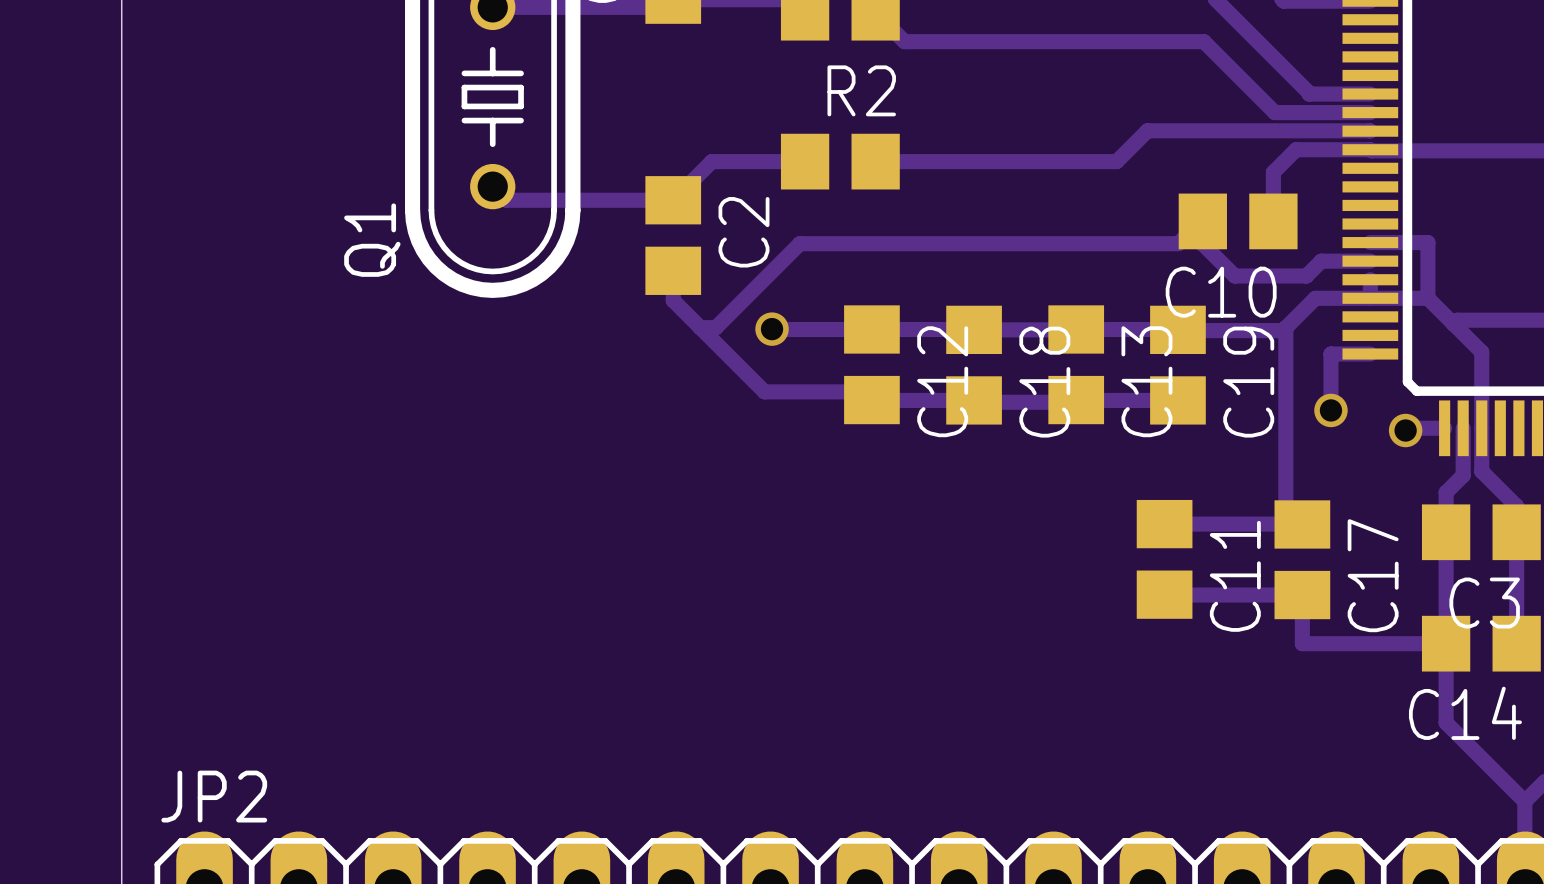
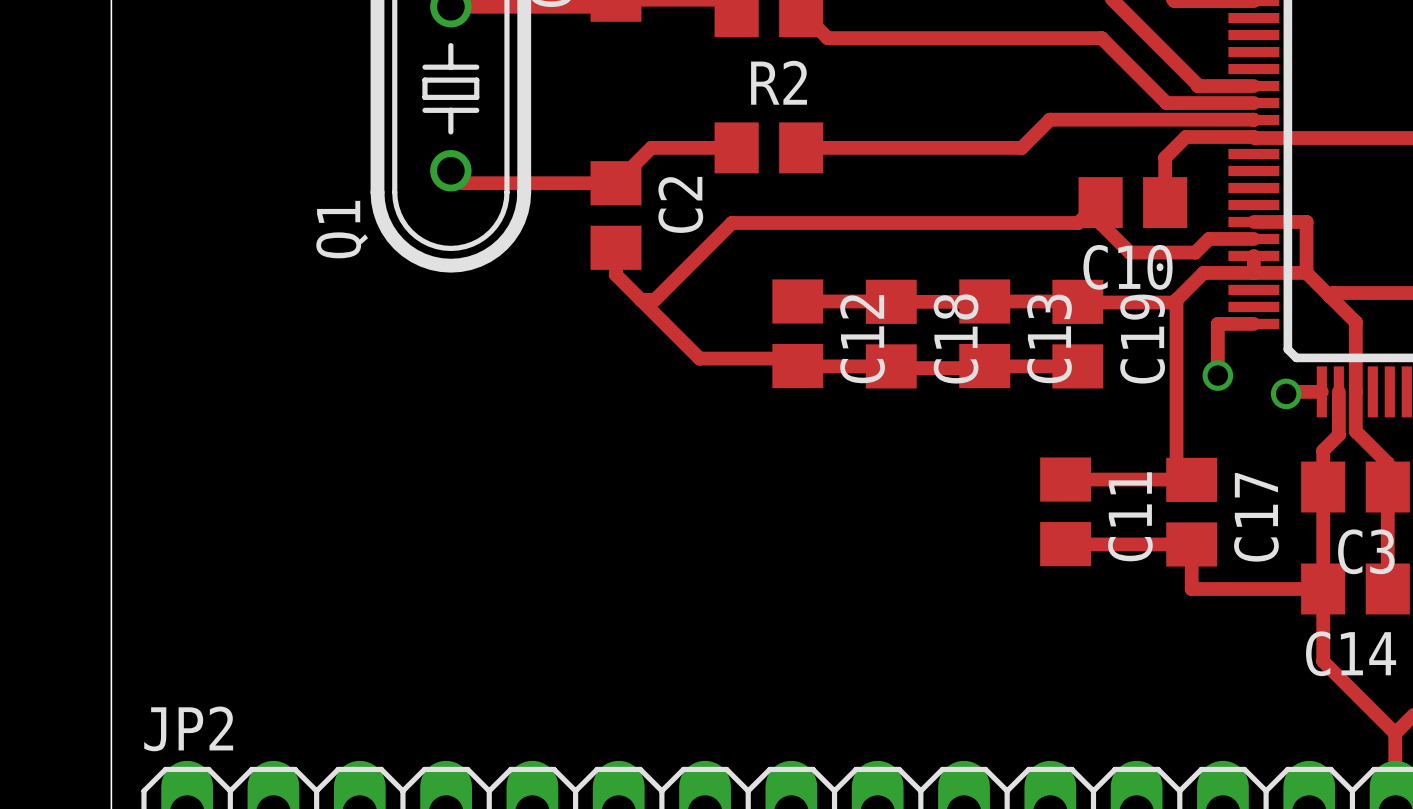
track: (772, 329) (871, 329) -> none
via: (772, 329) -> none

